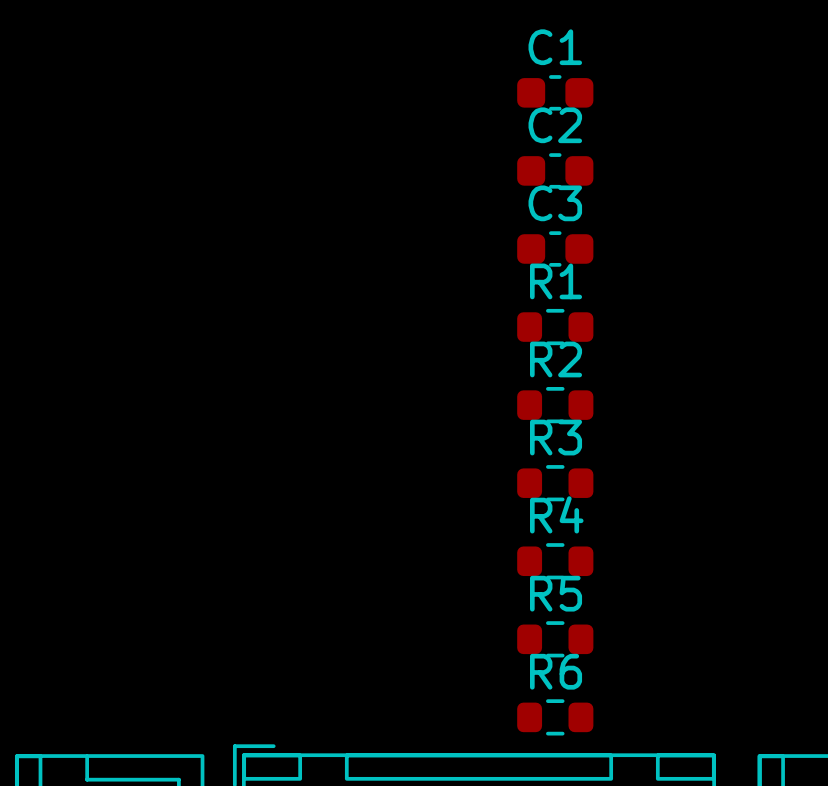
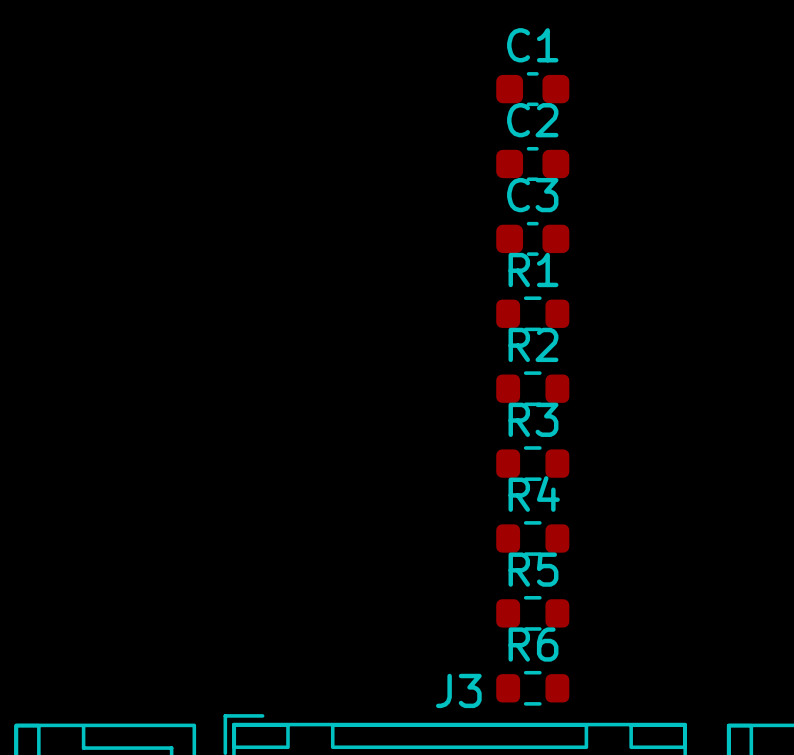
J3 name: none -> J3 (458, 690)

